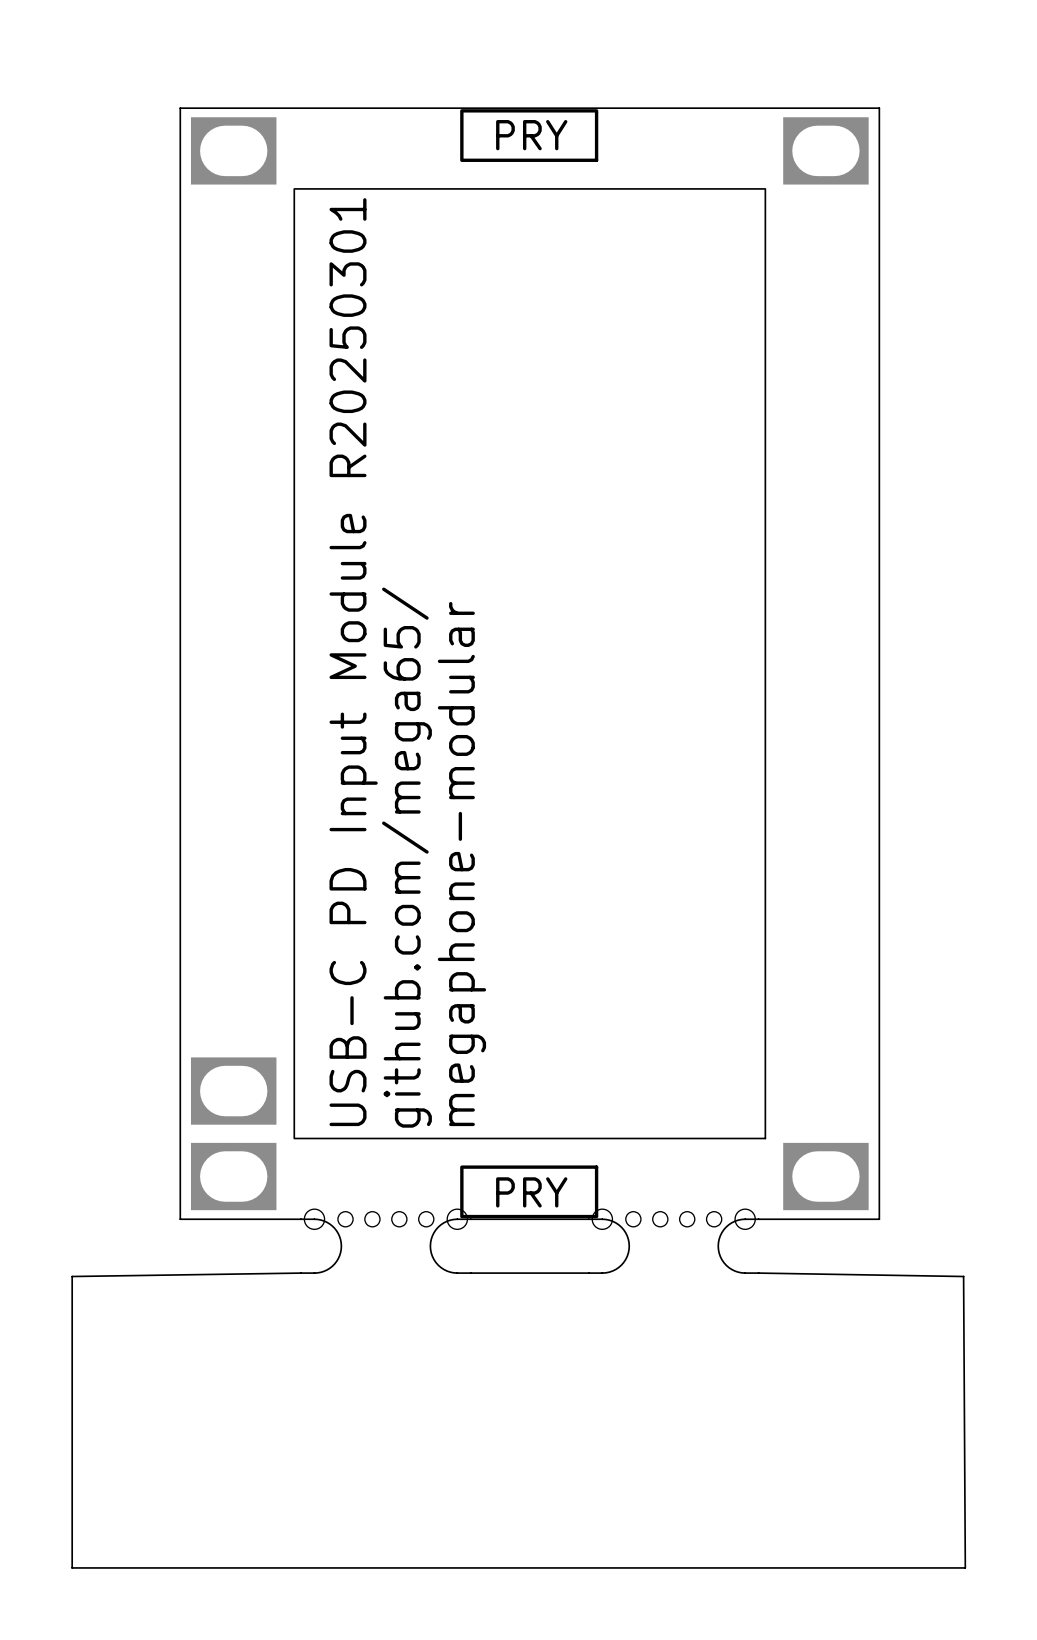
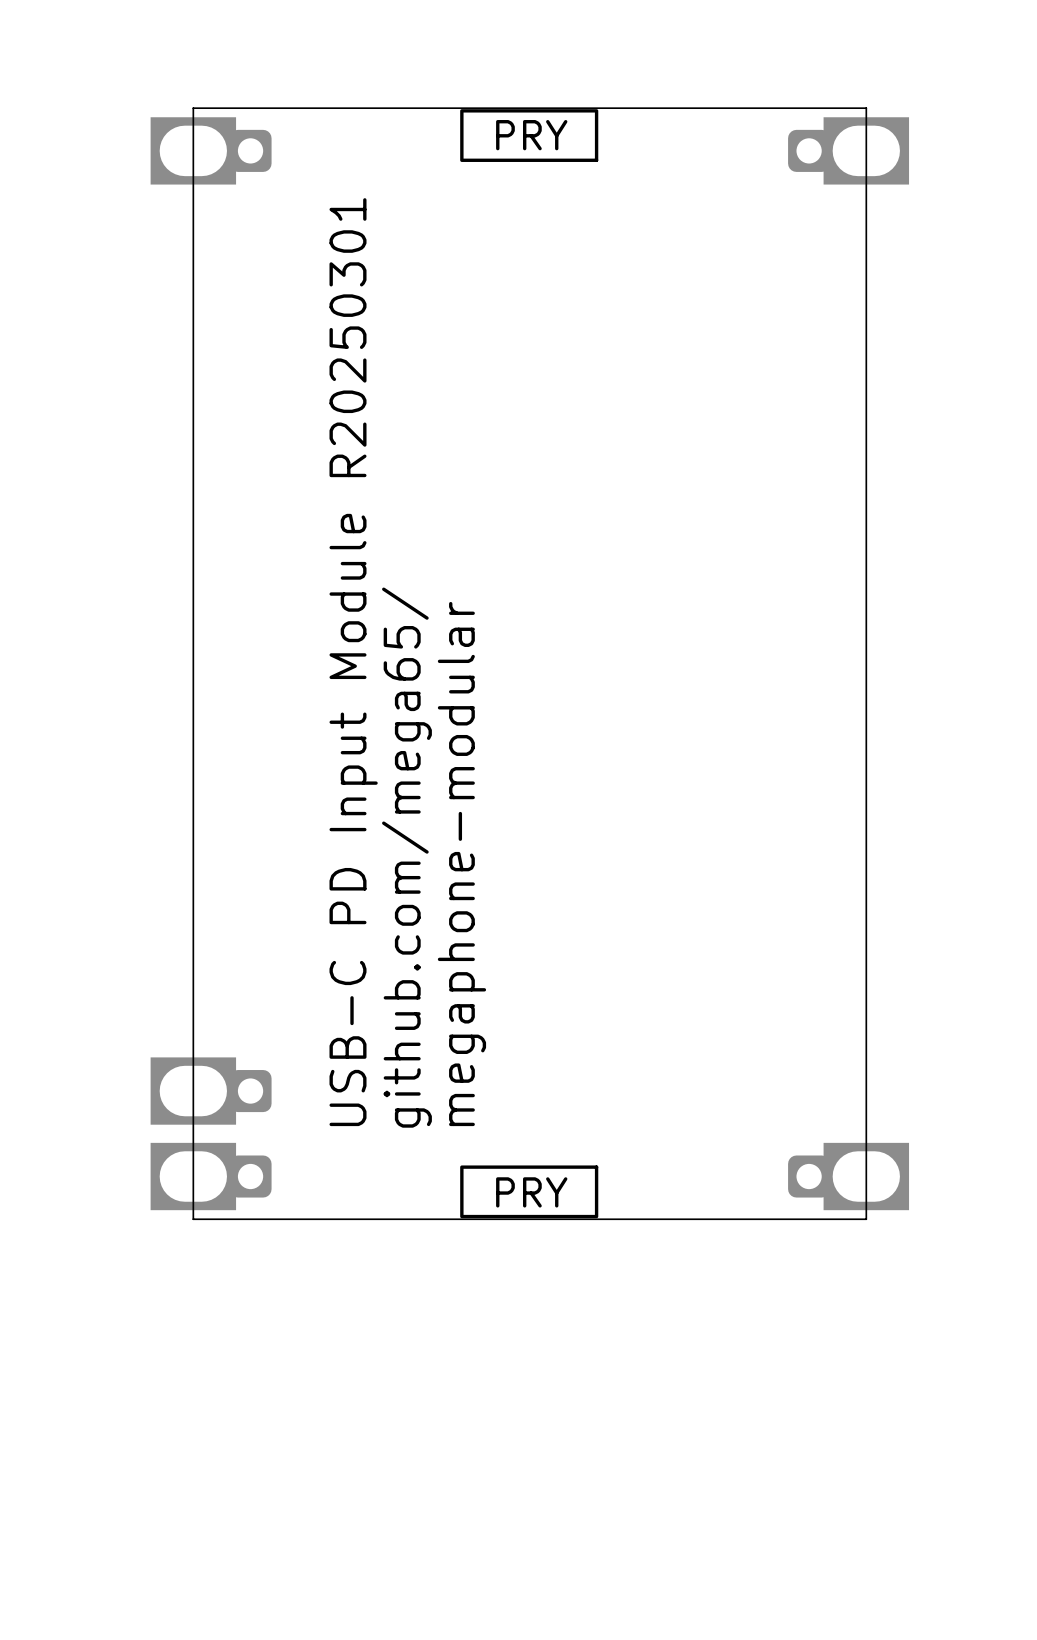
part footprint: [179, 107, 881, 1274] -> [150, 107, 910, 1221]
board edge: (588, 1273) (470, 1273) -> none
board edge: (758, 1273) (963, 1276) (965, 1567) (72, 1567) (72, 1276) (301, 1273) -> none

